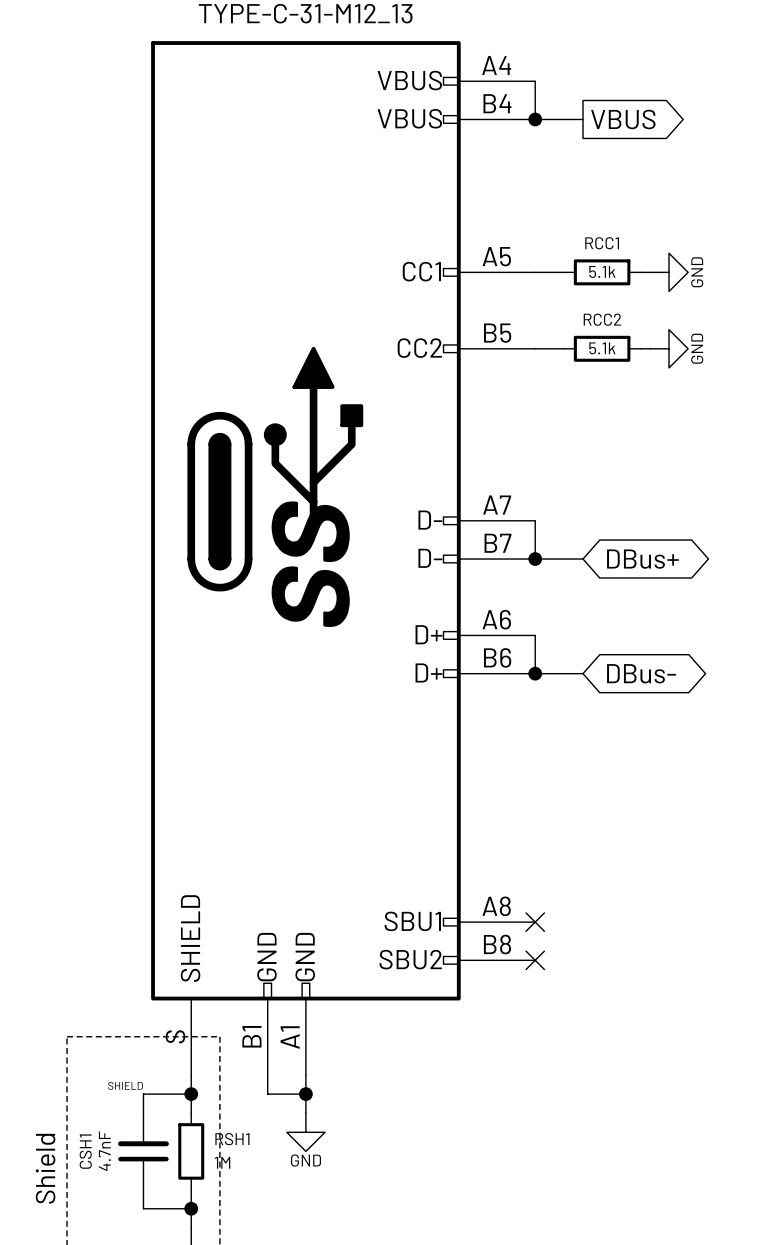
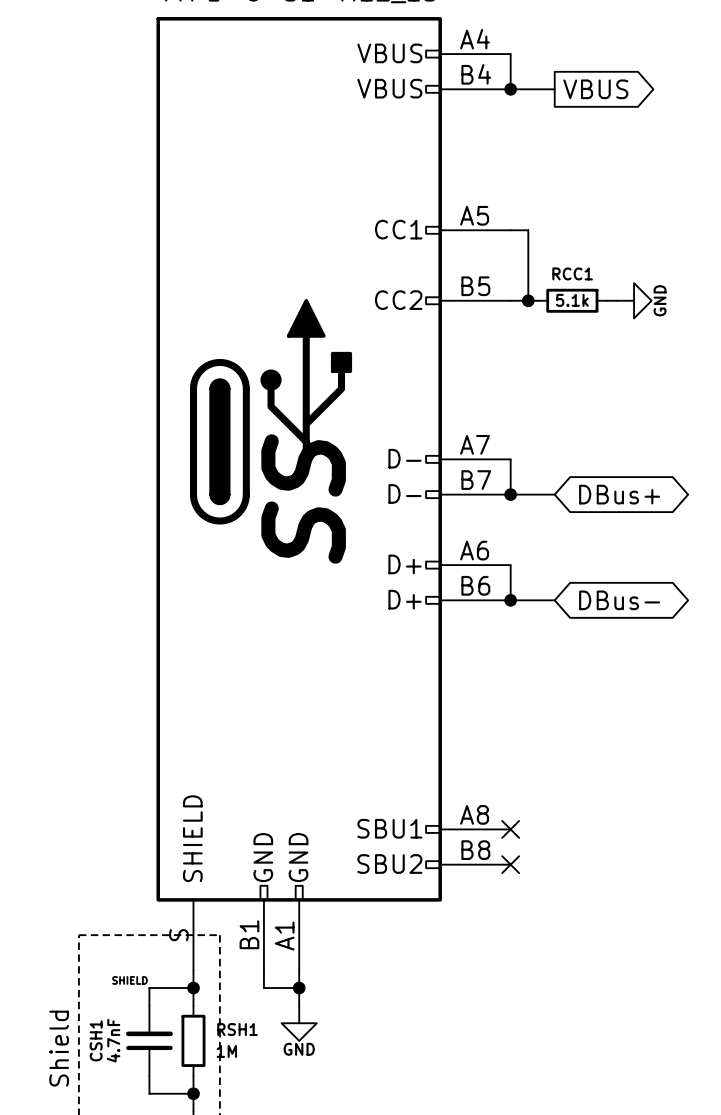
wire: (554, 272) (563, 272) -> (528, 230) (528, 300)
RCC1: 5.1k (602, 272) -> none
wire: (640, 272) (649, 272) -> none
power symbol: GND (669, 272) -> none
RCC2 name: RCC2 (602, 319) -> RCC1 (572, 273)
junction: none -> (528, 300)

